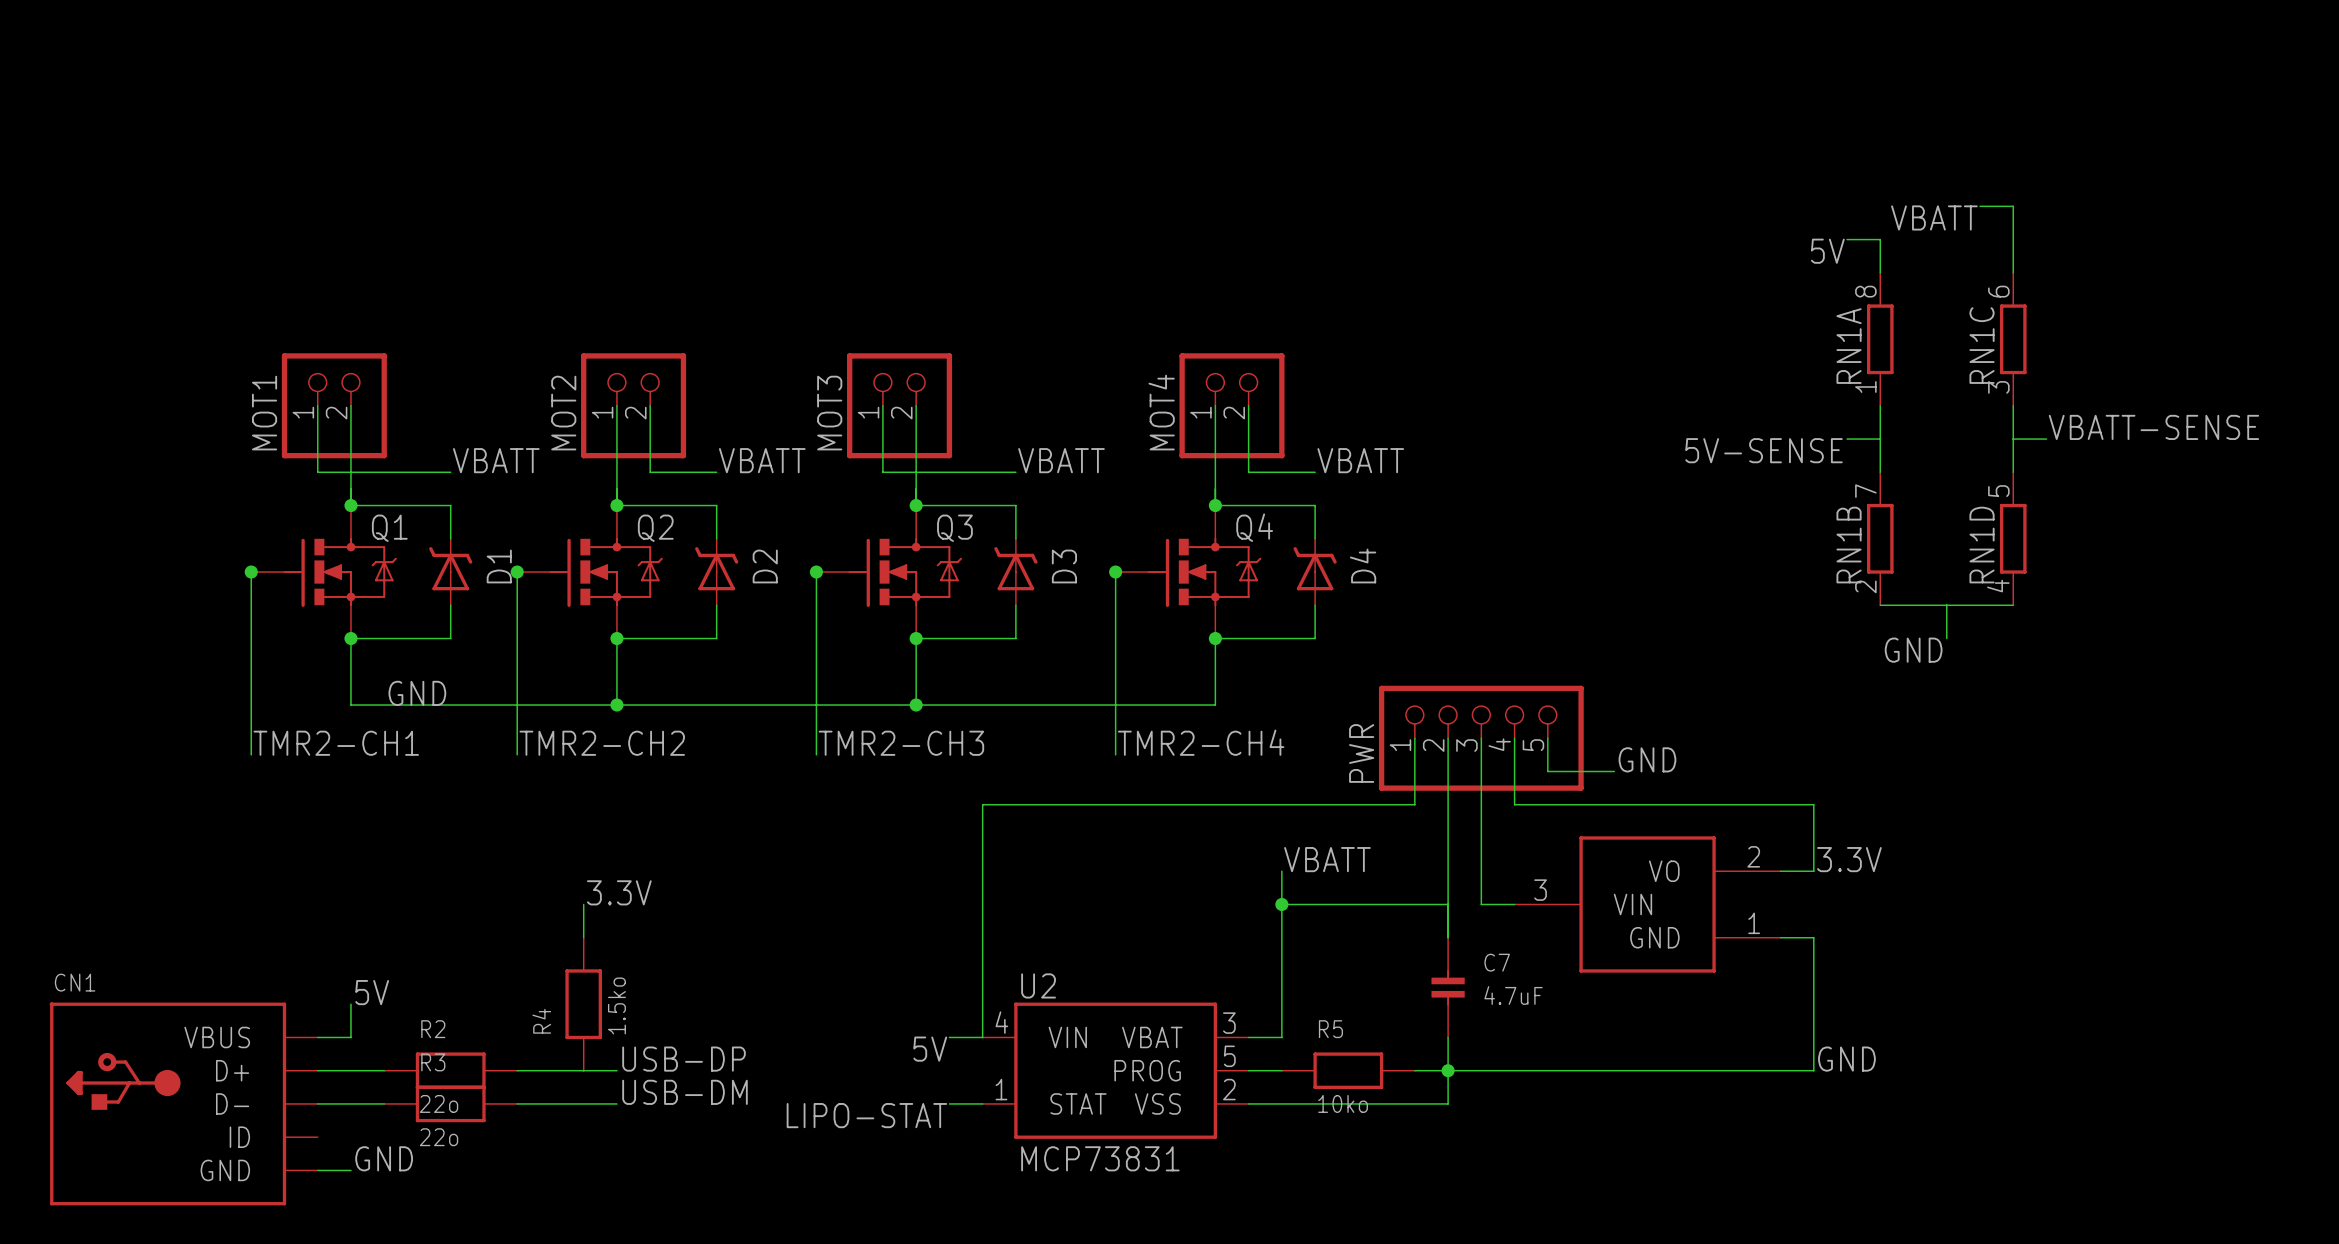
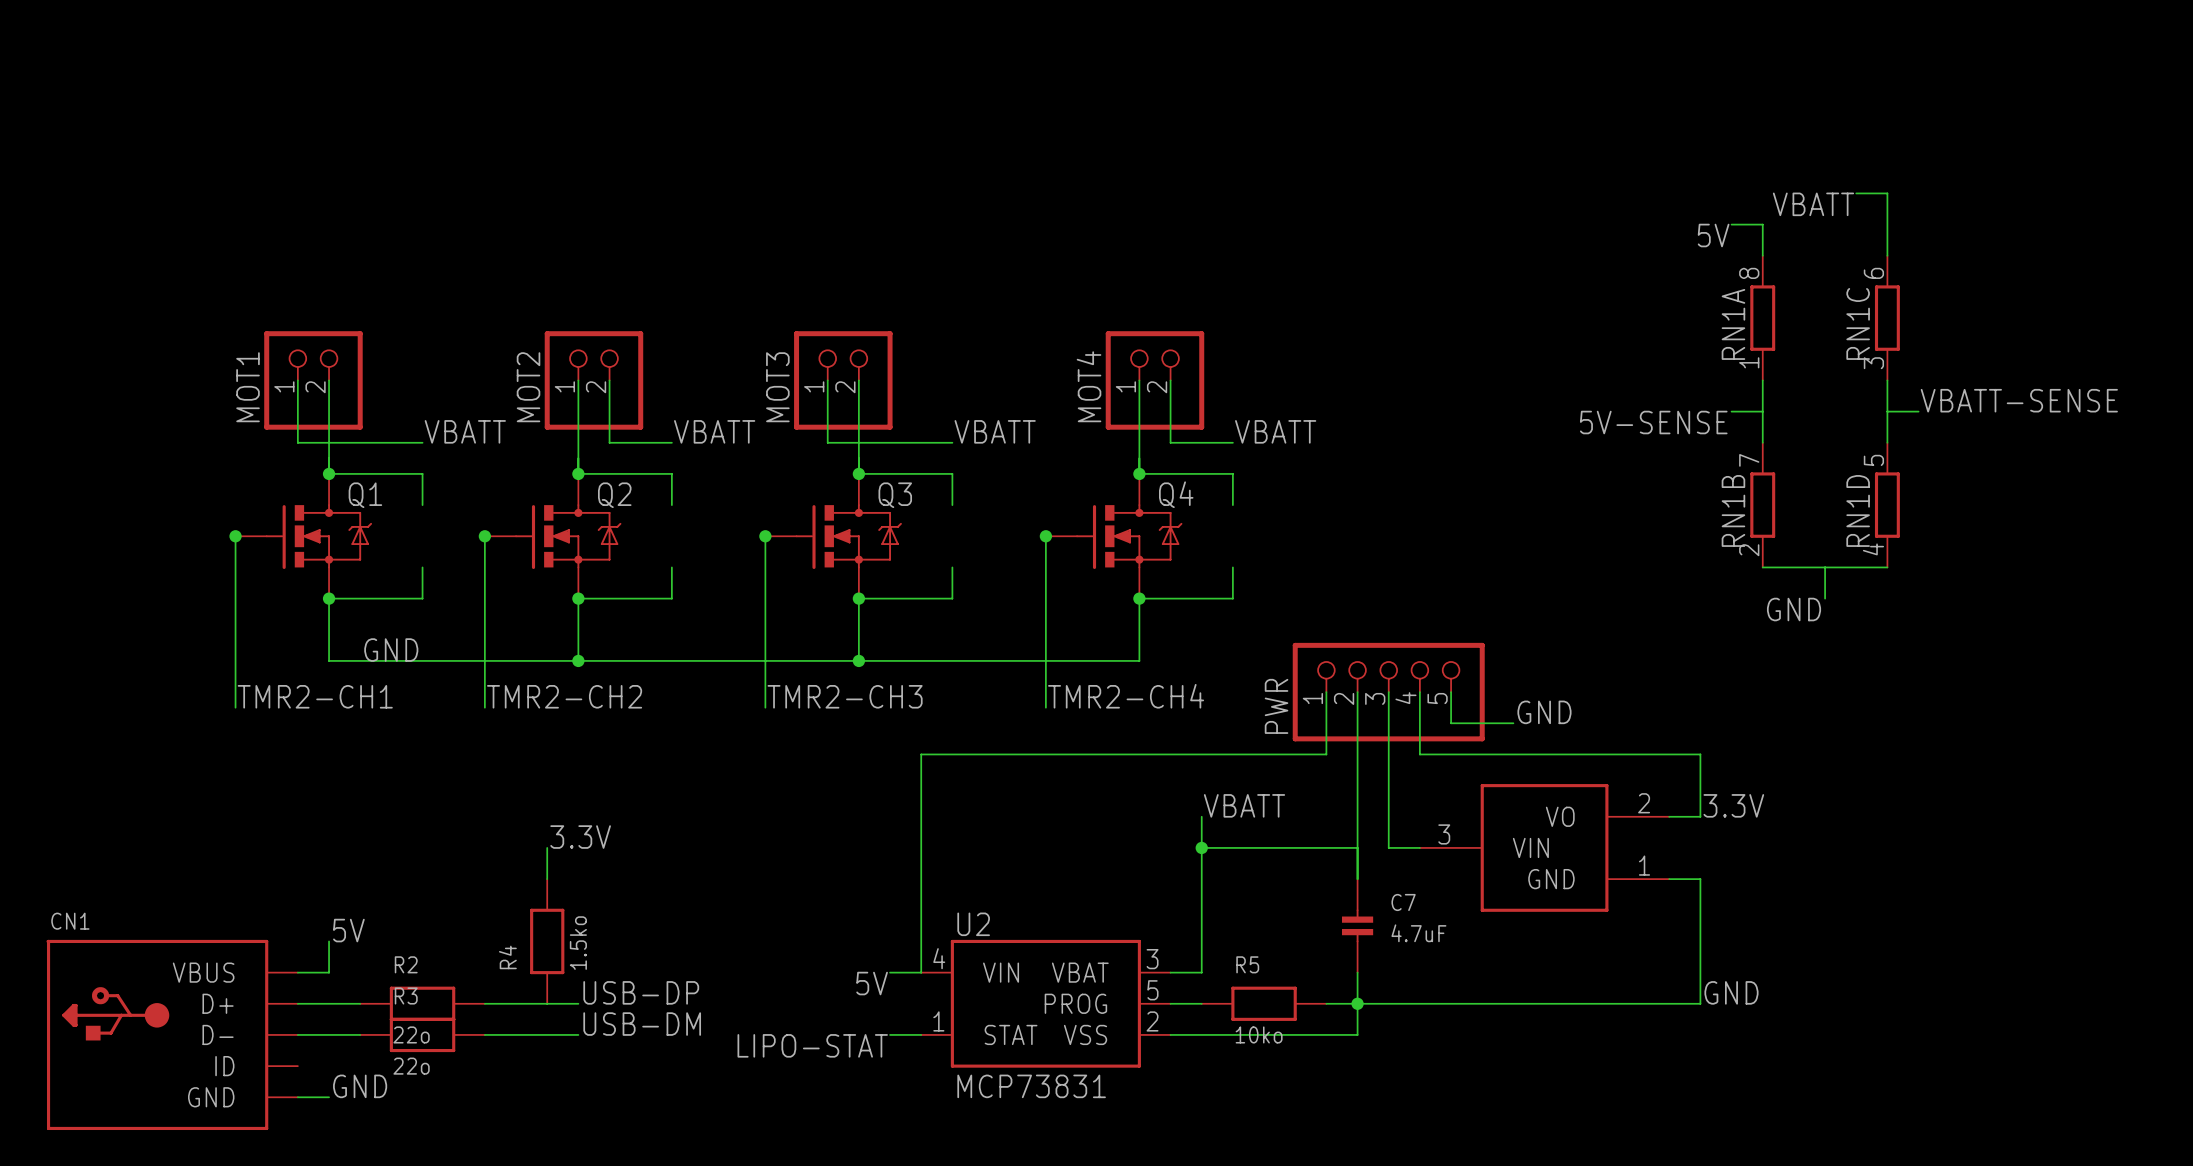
D1: (450, 572) -> none
D2: (716, 572) -> none
D3: (1015, 572) -> none
D4: (1315, 572) -> none

